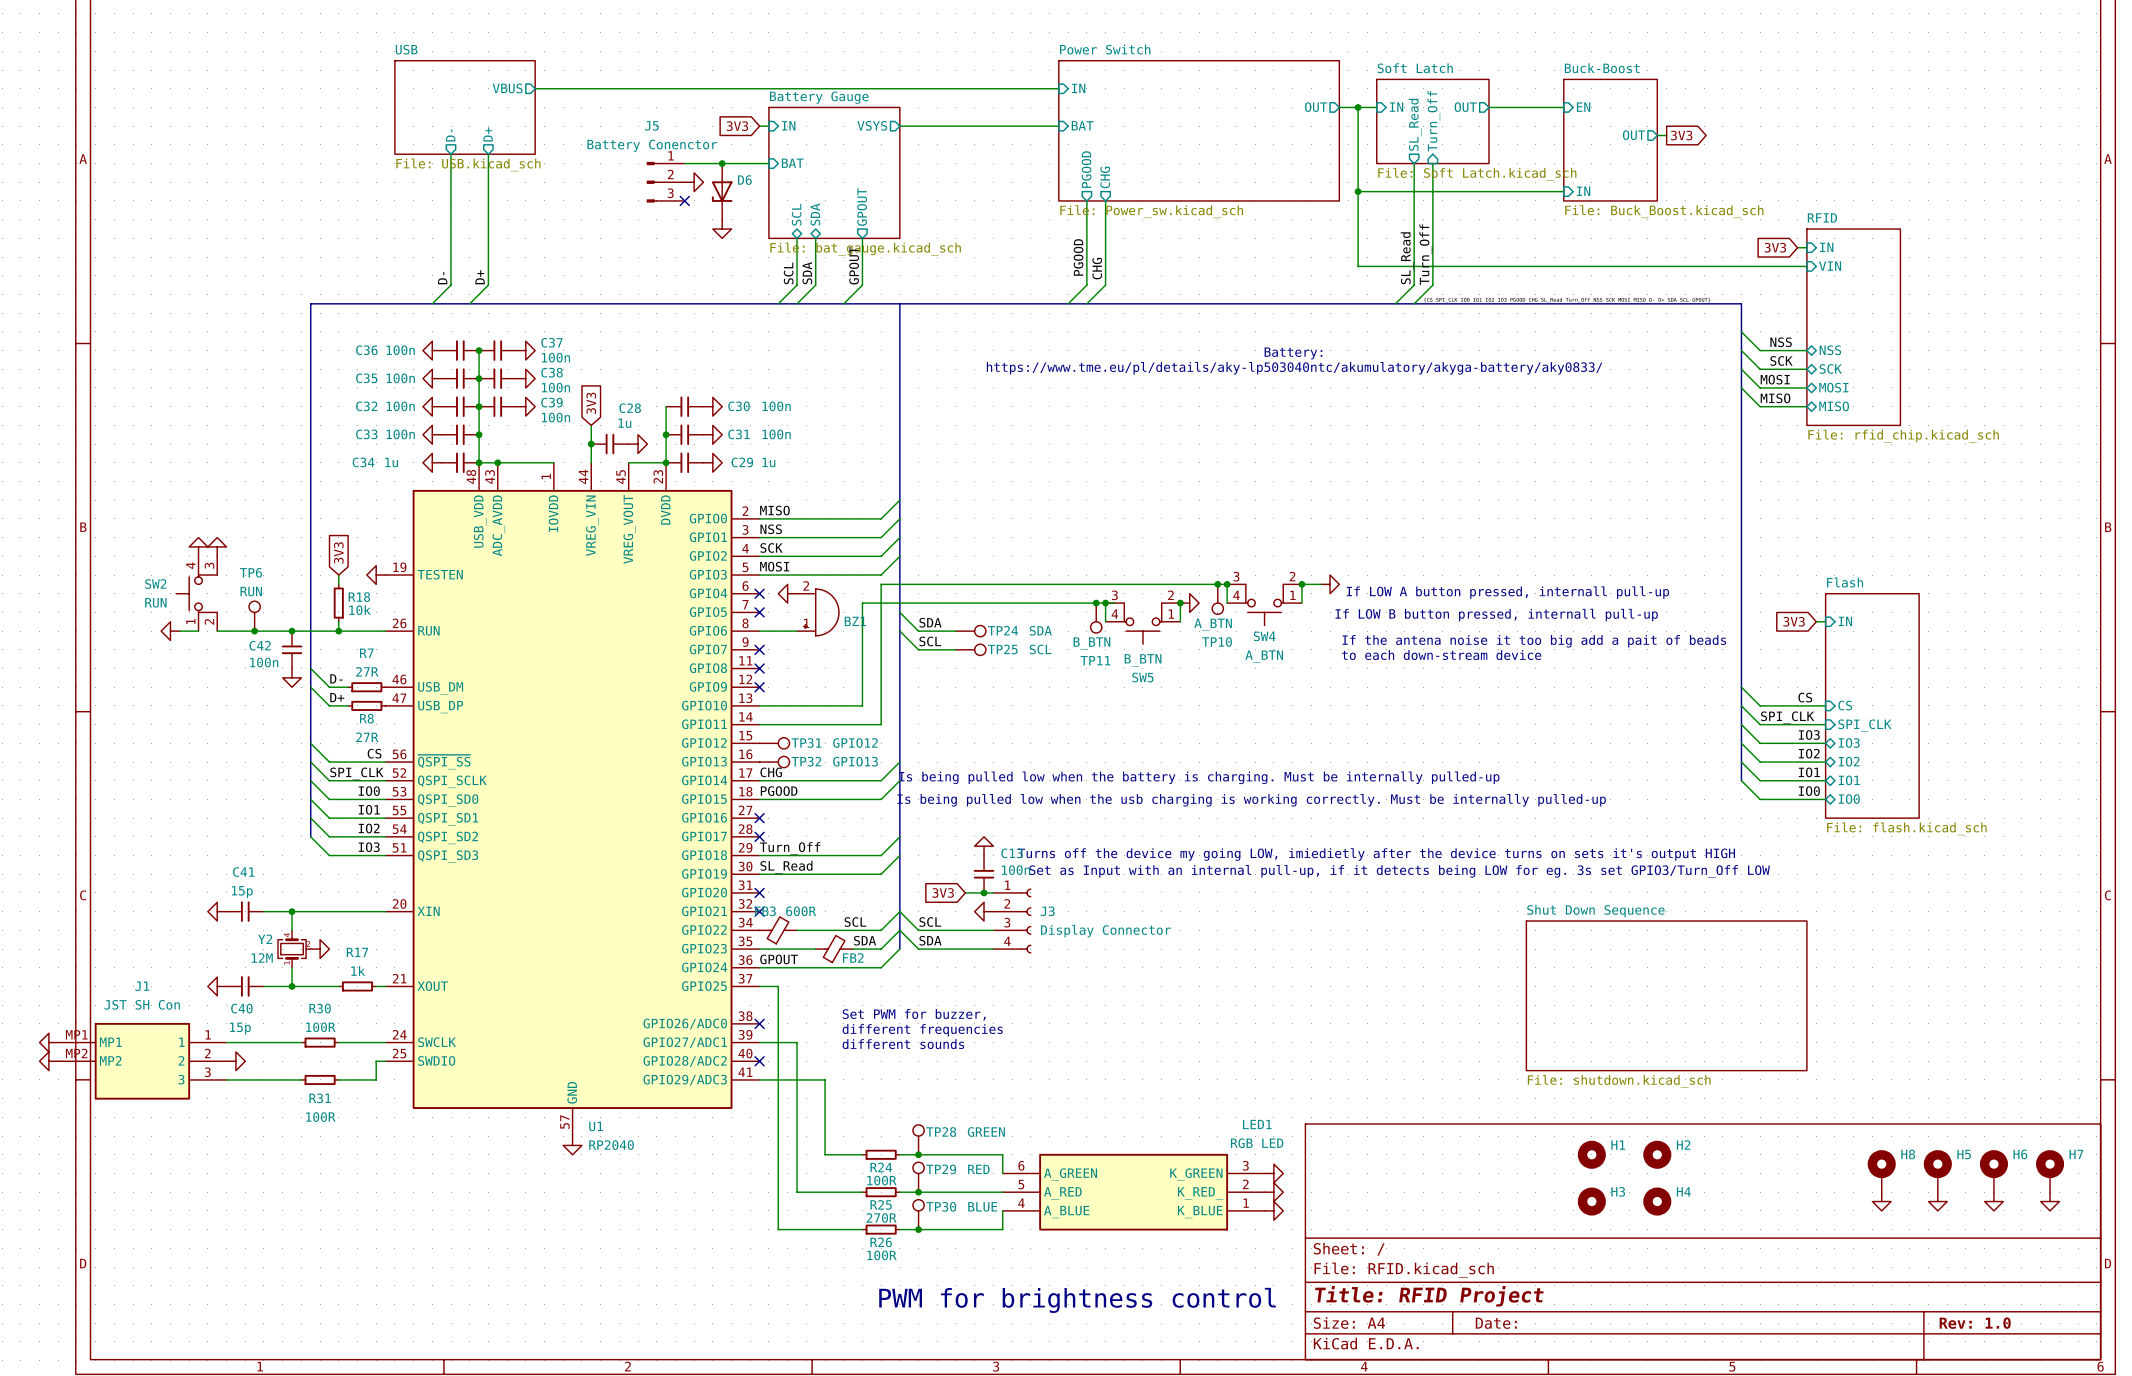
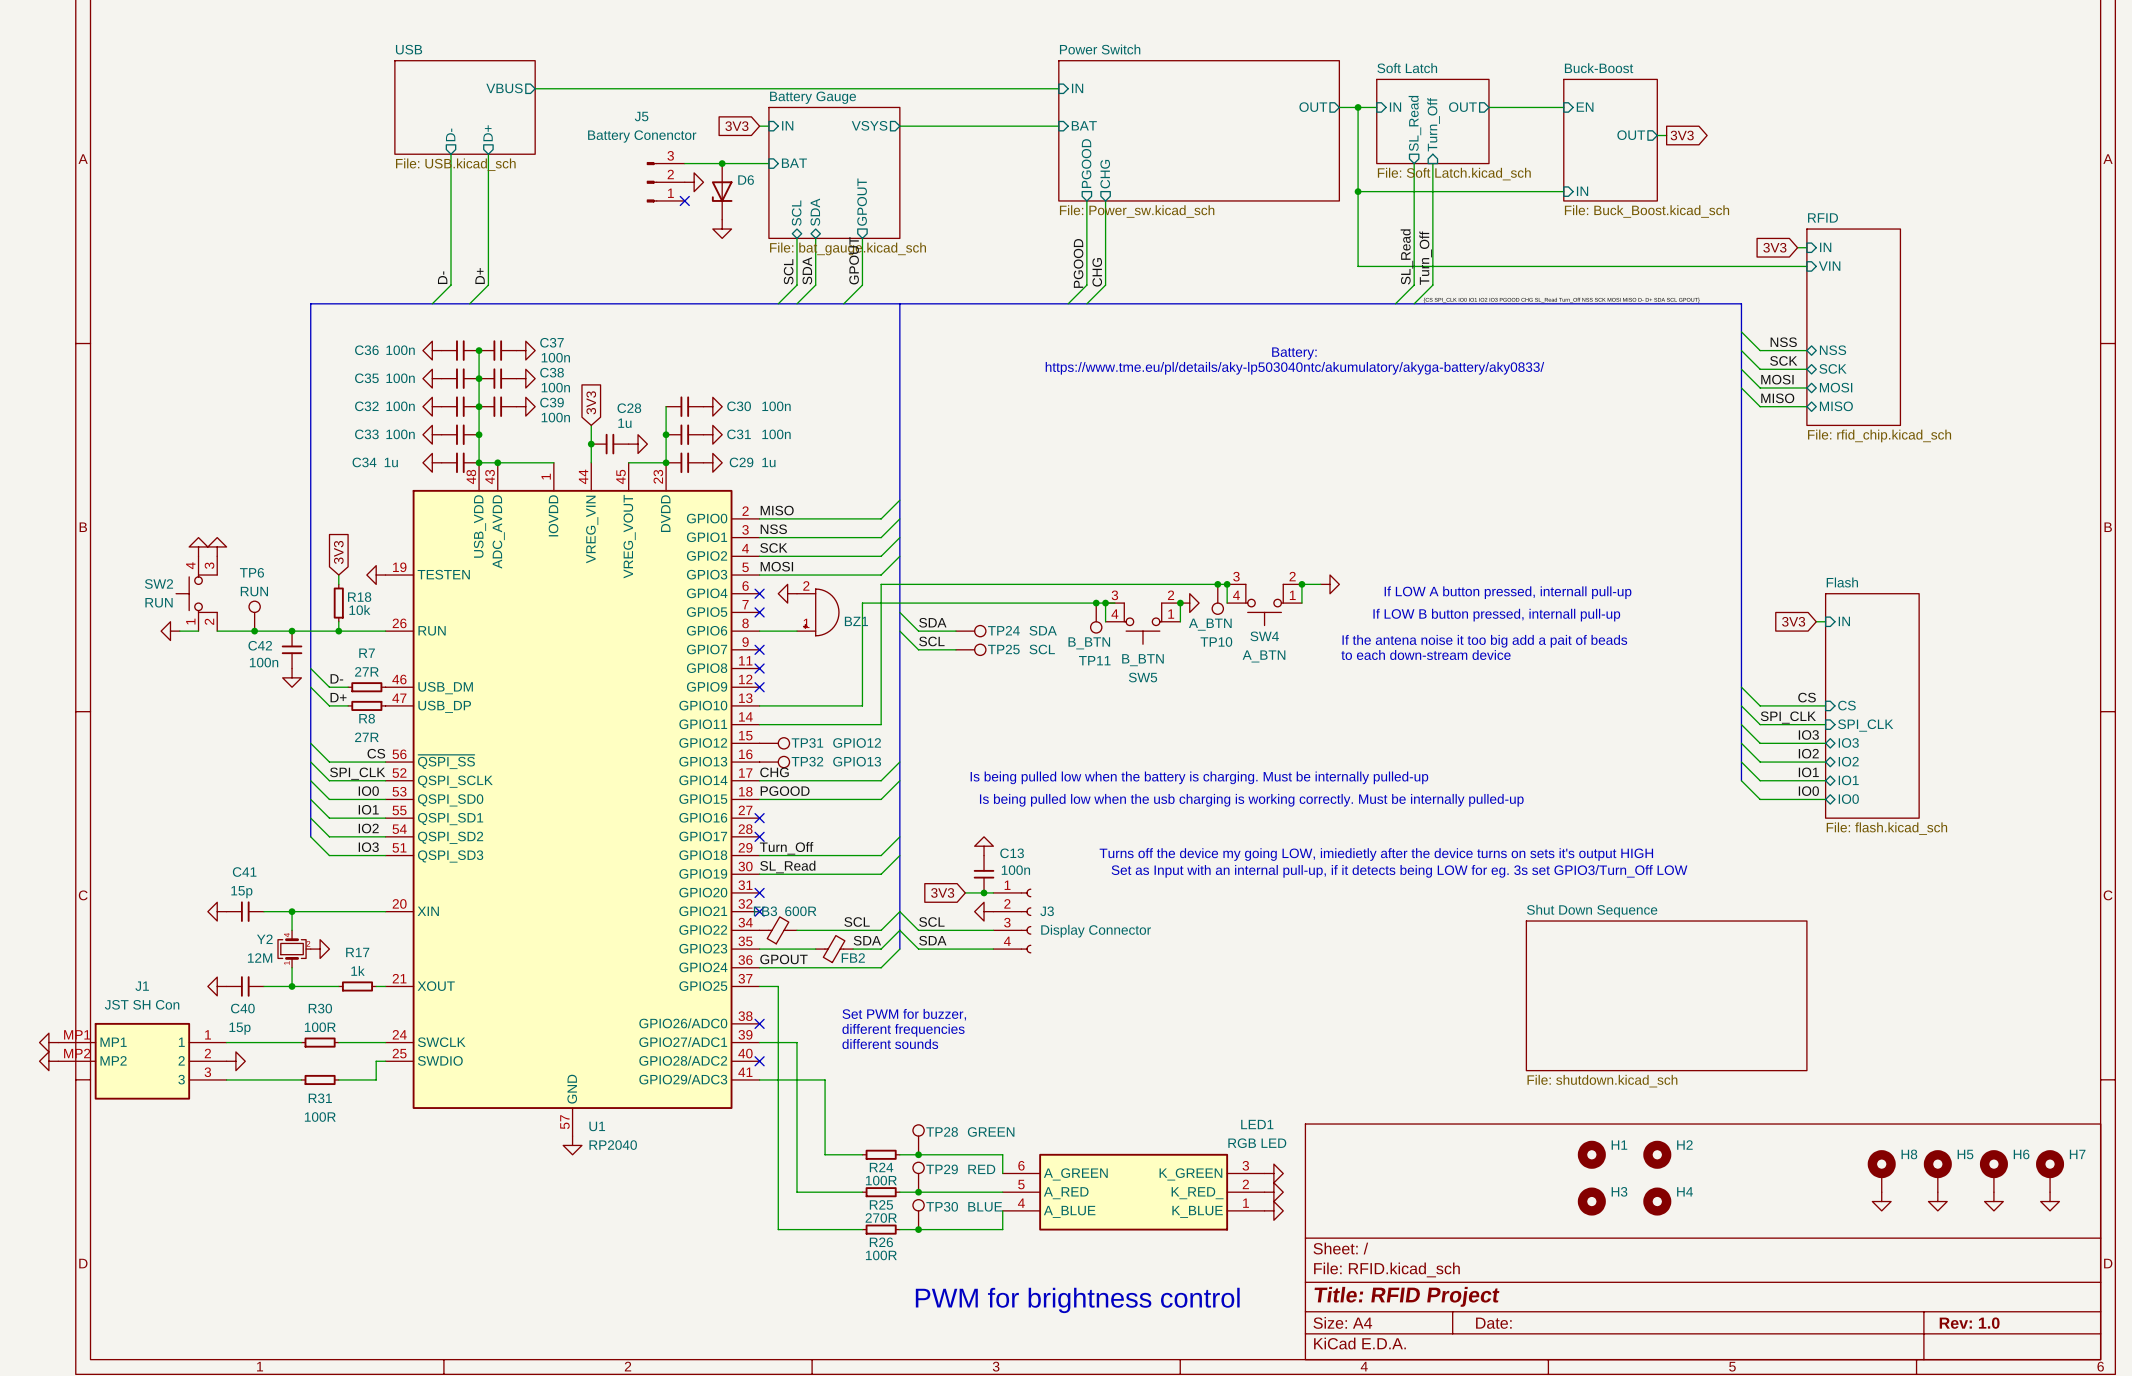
J5 flip: as is (652, 182) -> up-down (652, 182)

